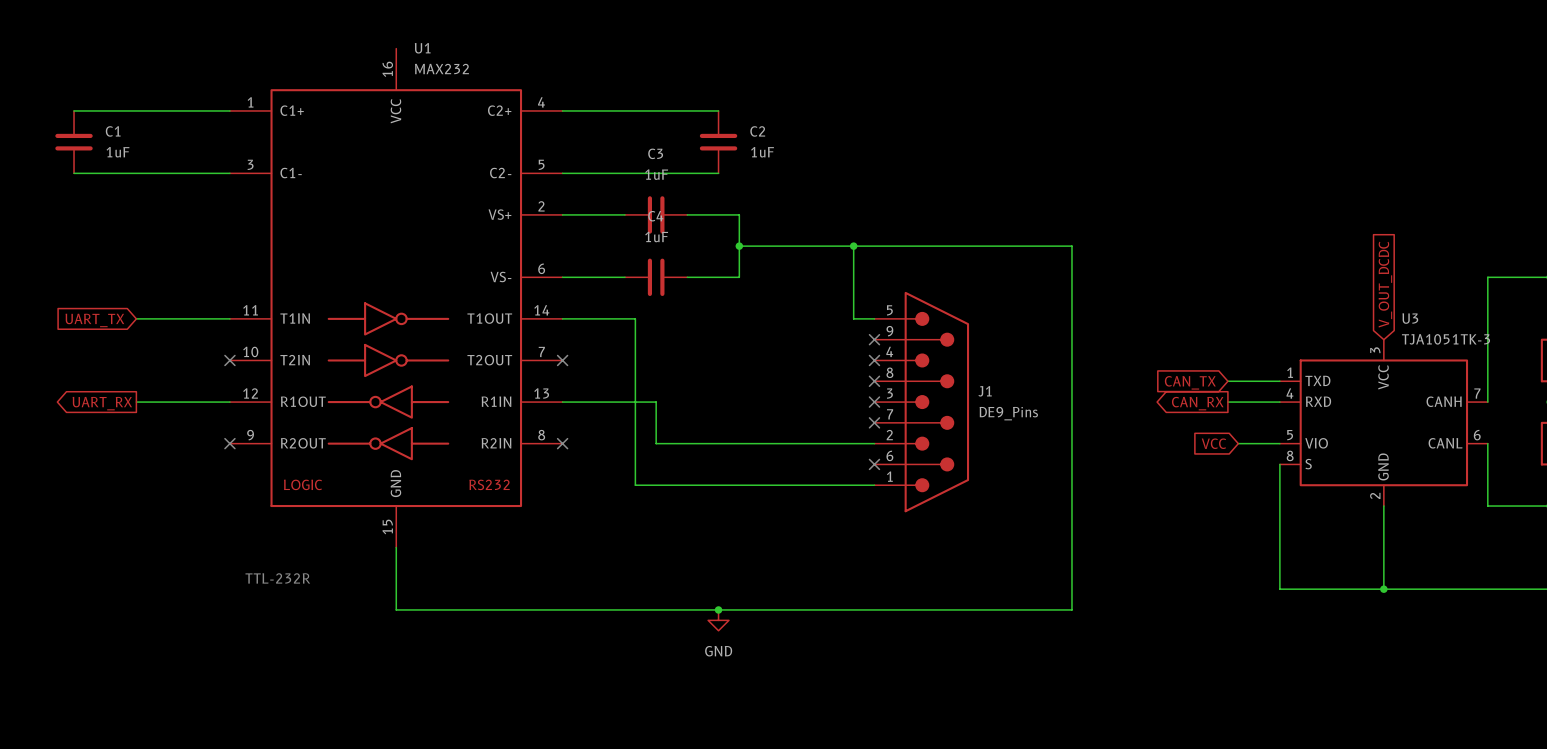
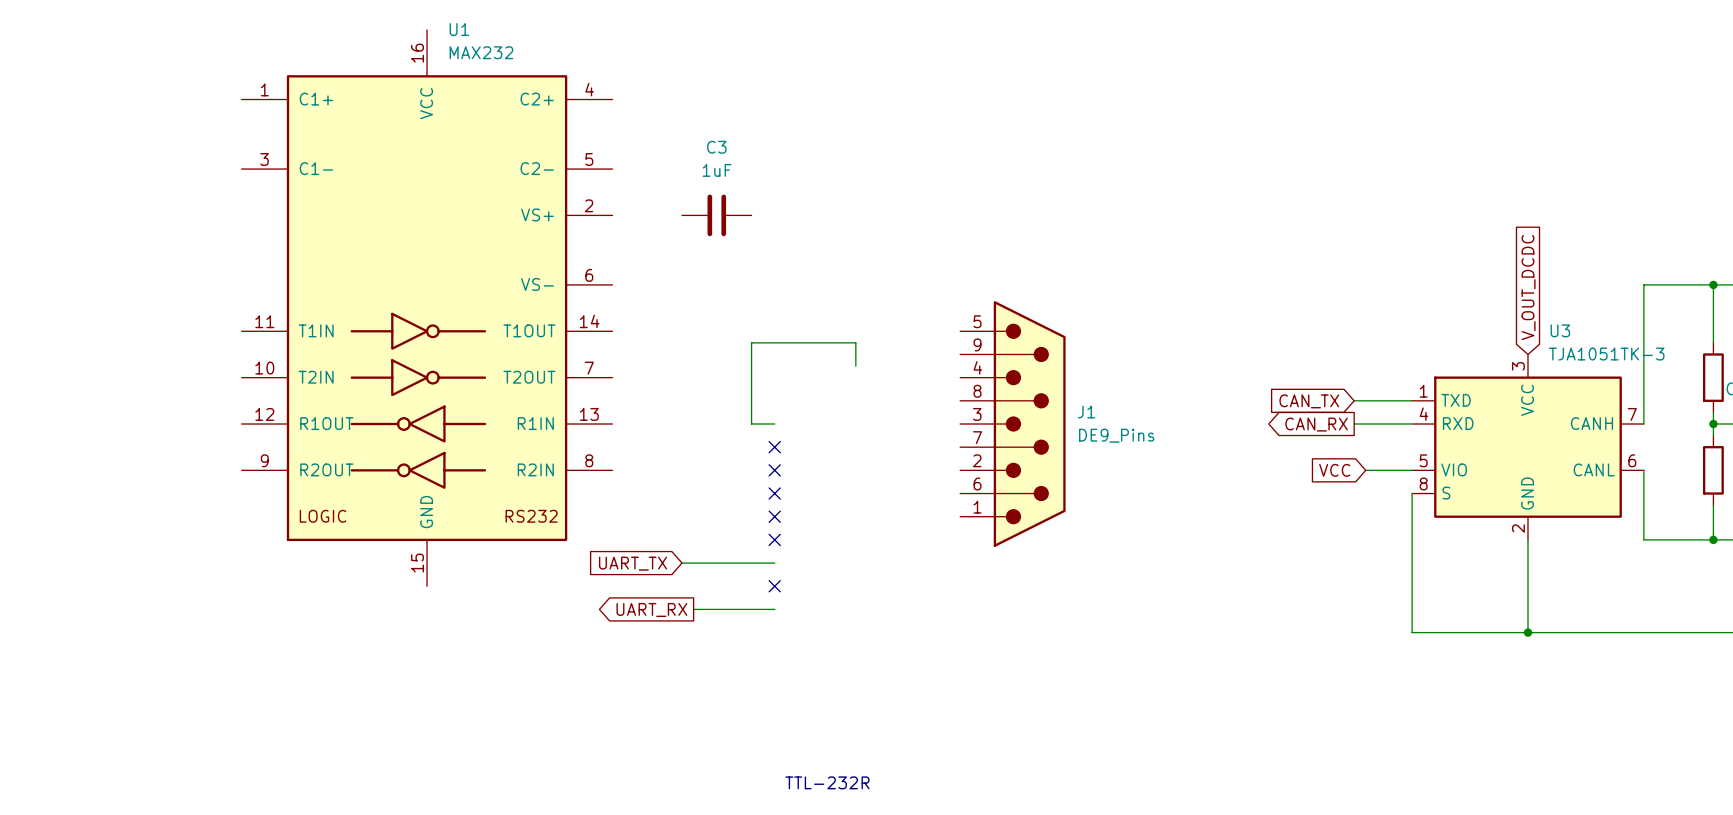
wire: (74, 110) (229, 110) -> none
wire: (562, 110) (718, 110) -> none
C1: 1uF (74, 142) -> none
C2: 1uF (718, 142) -> none
wire: (74, 173) (229, 173) -> none
wire: (562, 173) (718, 173) -> none
wire: (562, 214) (624, 214) -> none
wire: (687, 214) (739, 214) (739, 277) (687, 277) -> none
wire: (739, 246) (1071, 246) (1071, 609) (396, 609) (396, 547) -> none
junction: (739, 246) -> none
wire: (853, 246) (853, 318) (874, 318) -> none
junction: (853, 246) -> none
wire: (562, 277) (624, 277) -> none
C4: 1uF (656, 277) -> none
wire: (136, 318) (229, 318) -> none
wire: (562, 318) (635, 318) (635, 485) (874, 485) -> none
global label: UART_TX (94, 320) -> none
no-connect mark: (874, 339) -> none
wire: none -> (855, 366) (855, 342) (751, 342) (751, 424) (774, 424)
no-connect mark: (229, 360) -> none
no-connect mark: (562, 360) -> none
no-connect mark: (874, 360) -> none
no-connect mark: (874, 381) -> none
wire: (136, 402) (229, 402) -> none
wire: (562, 402) (656, 402) (656, 443) (874, 443) -> none
no-connect mark: (874, 402) -> none
global label: UART_RX (102, 403) -> none
no-connect mark: none -> (774, 447)
no-connect mark: (874, 422) -> none
no-connect mark: (229, 443) -> none
no-connect mark: (562, 443) -> none
no-connect mark: none -> (774, 470)
no-connect mark: none -> (774, 493)
no-connect mark: (874, 464) -> none
no-connect mark: none -> (774, 516)
no-connect mark: none -> (774, 539)
wire: none -> (682, 563) (774, 563)
global label: none -> UART_TX (633, 563)
no-connect mark: none -> (774, 586)
wire: none -> (693, 609) (774, 609)
global label: none -> UART_RX (651, 609)
text: TTL-232R (277, 578) -> none
junction: (718, 609) -> none
power symbol: GND (718, 620) -> none
text: none -> TTL-232R (827, 782)

